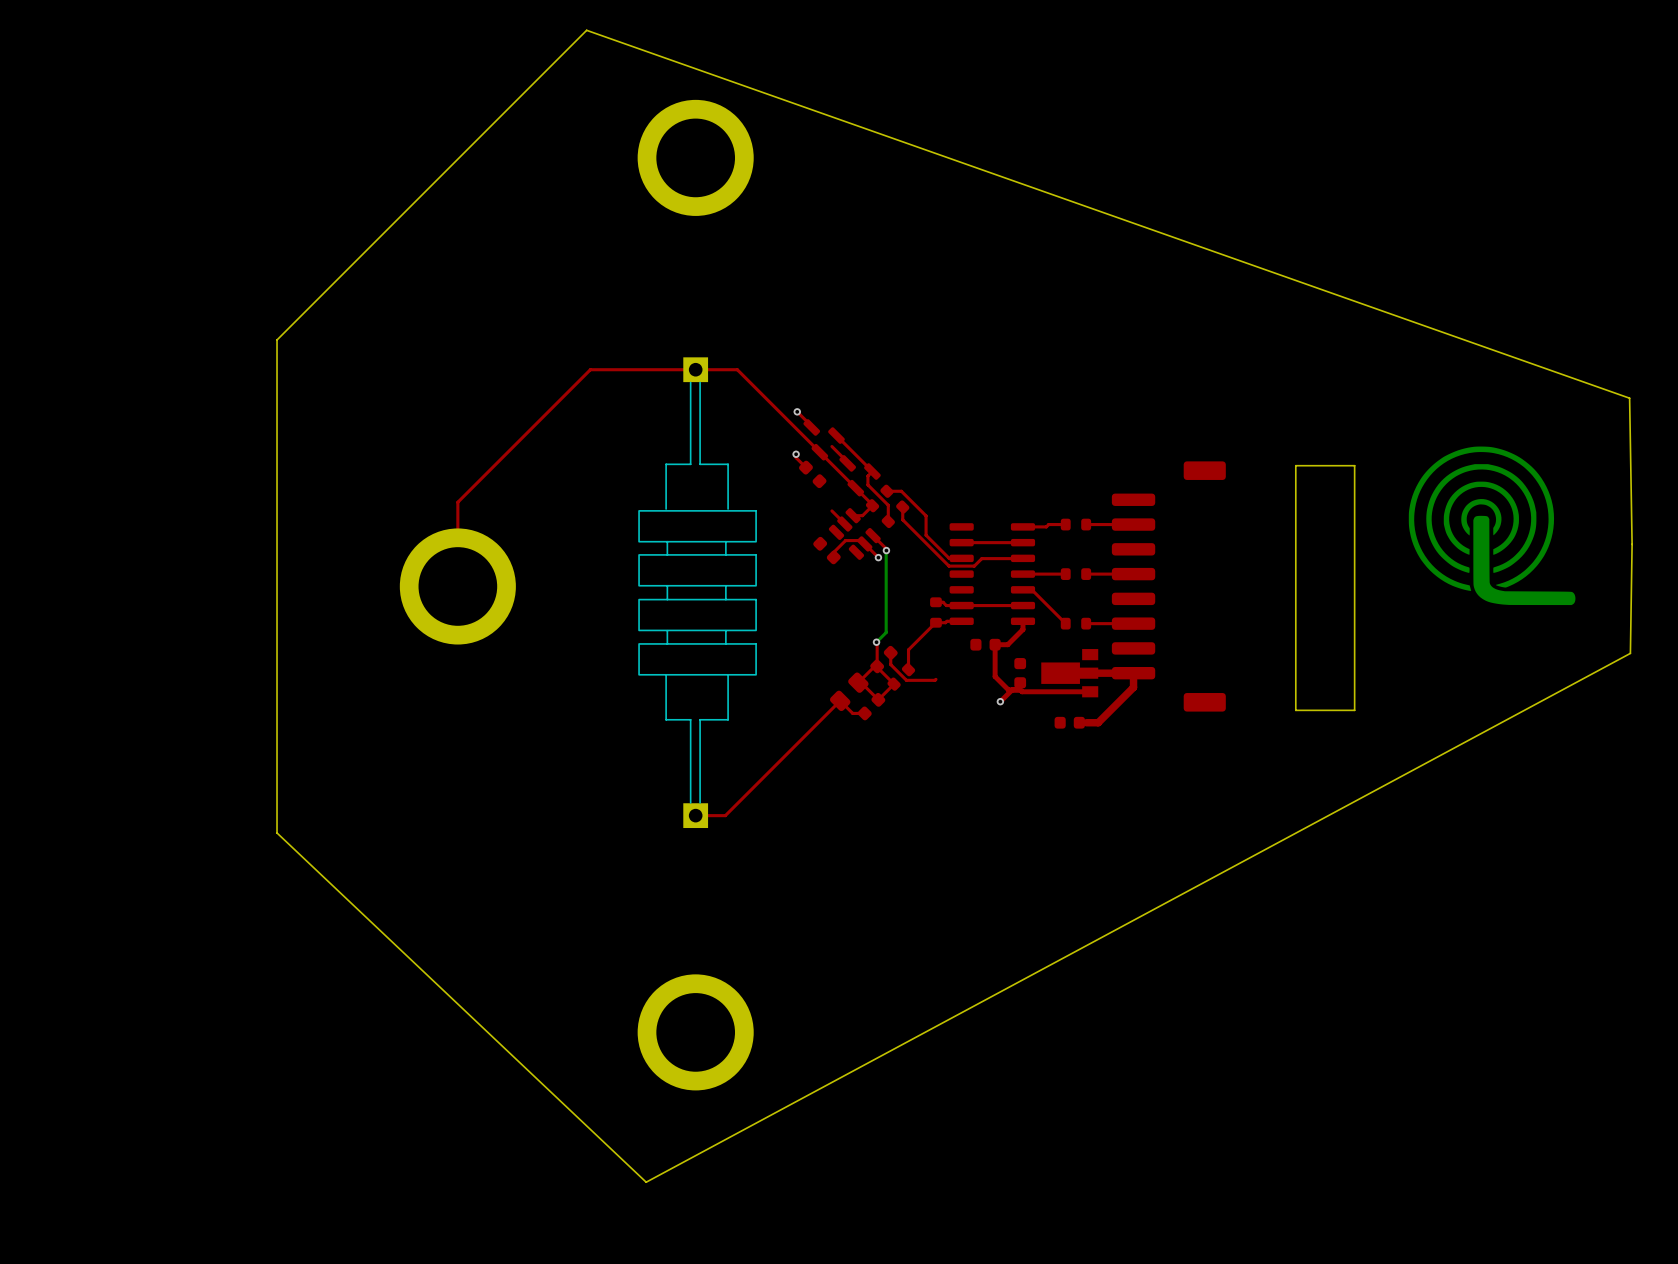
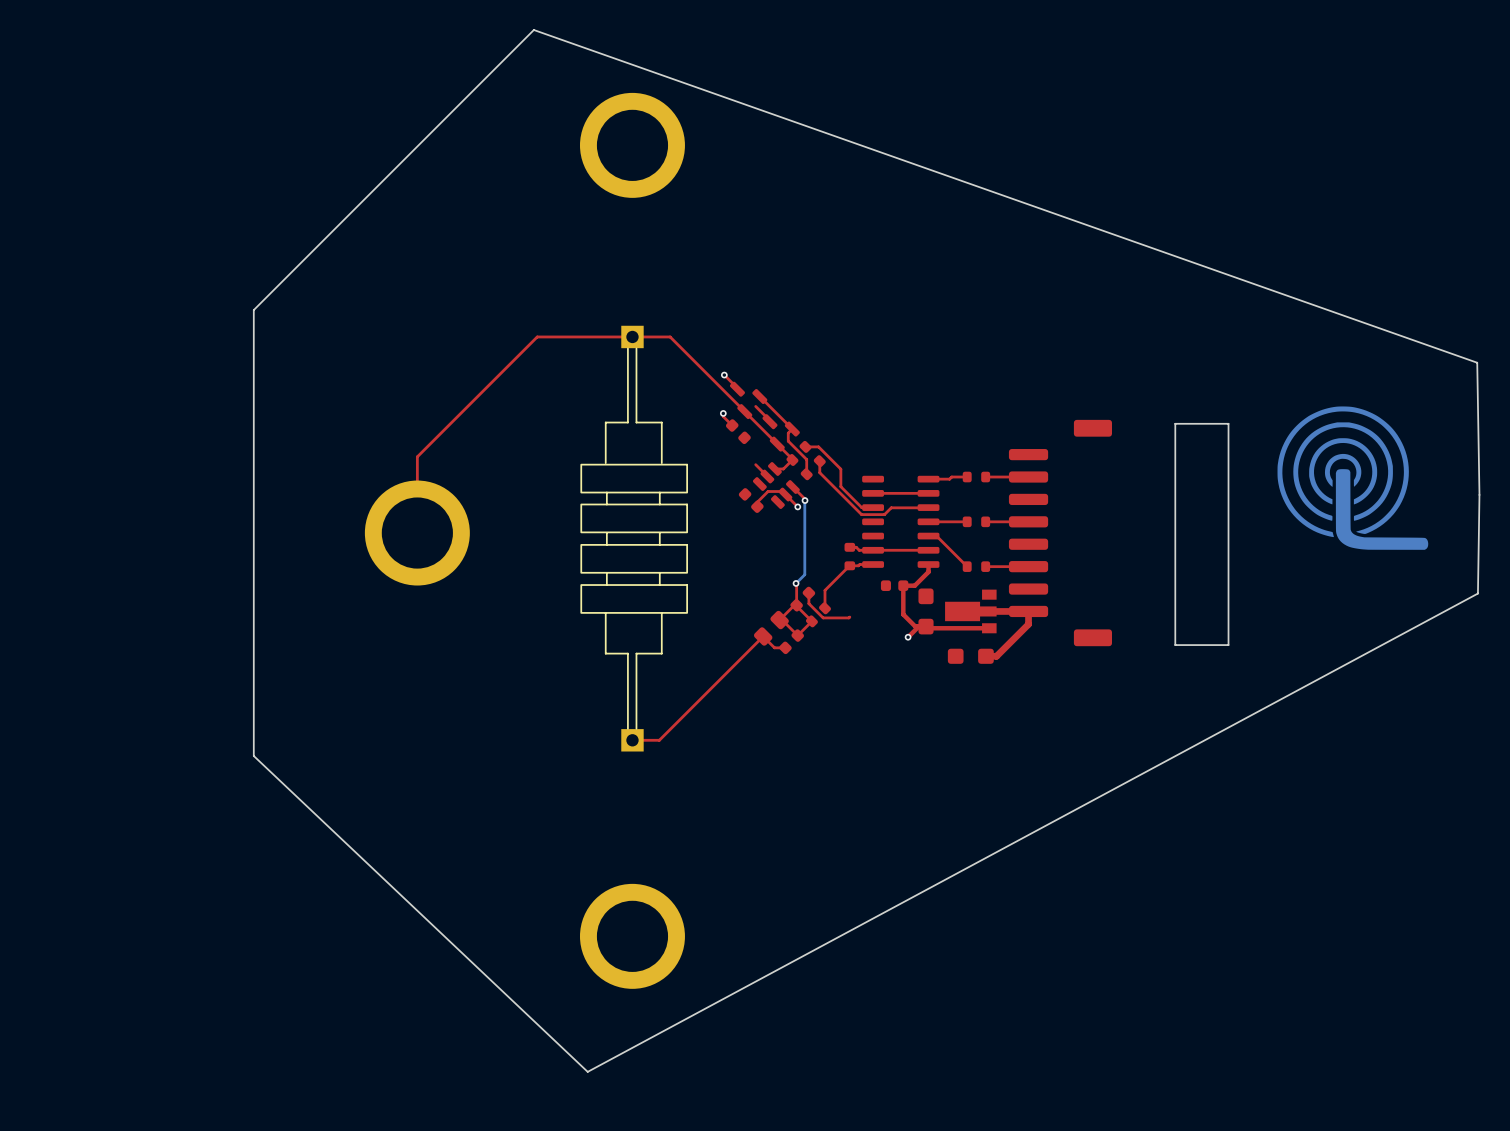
part footprint: [1014, 658, 1027, 689] -> [918, 588, 934, 635]
part footprint: [1054, 716, 1085, 729] -> [947, 648, 994, 664]

